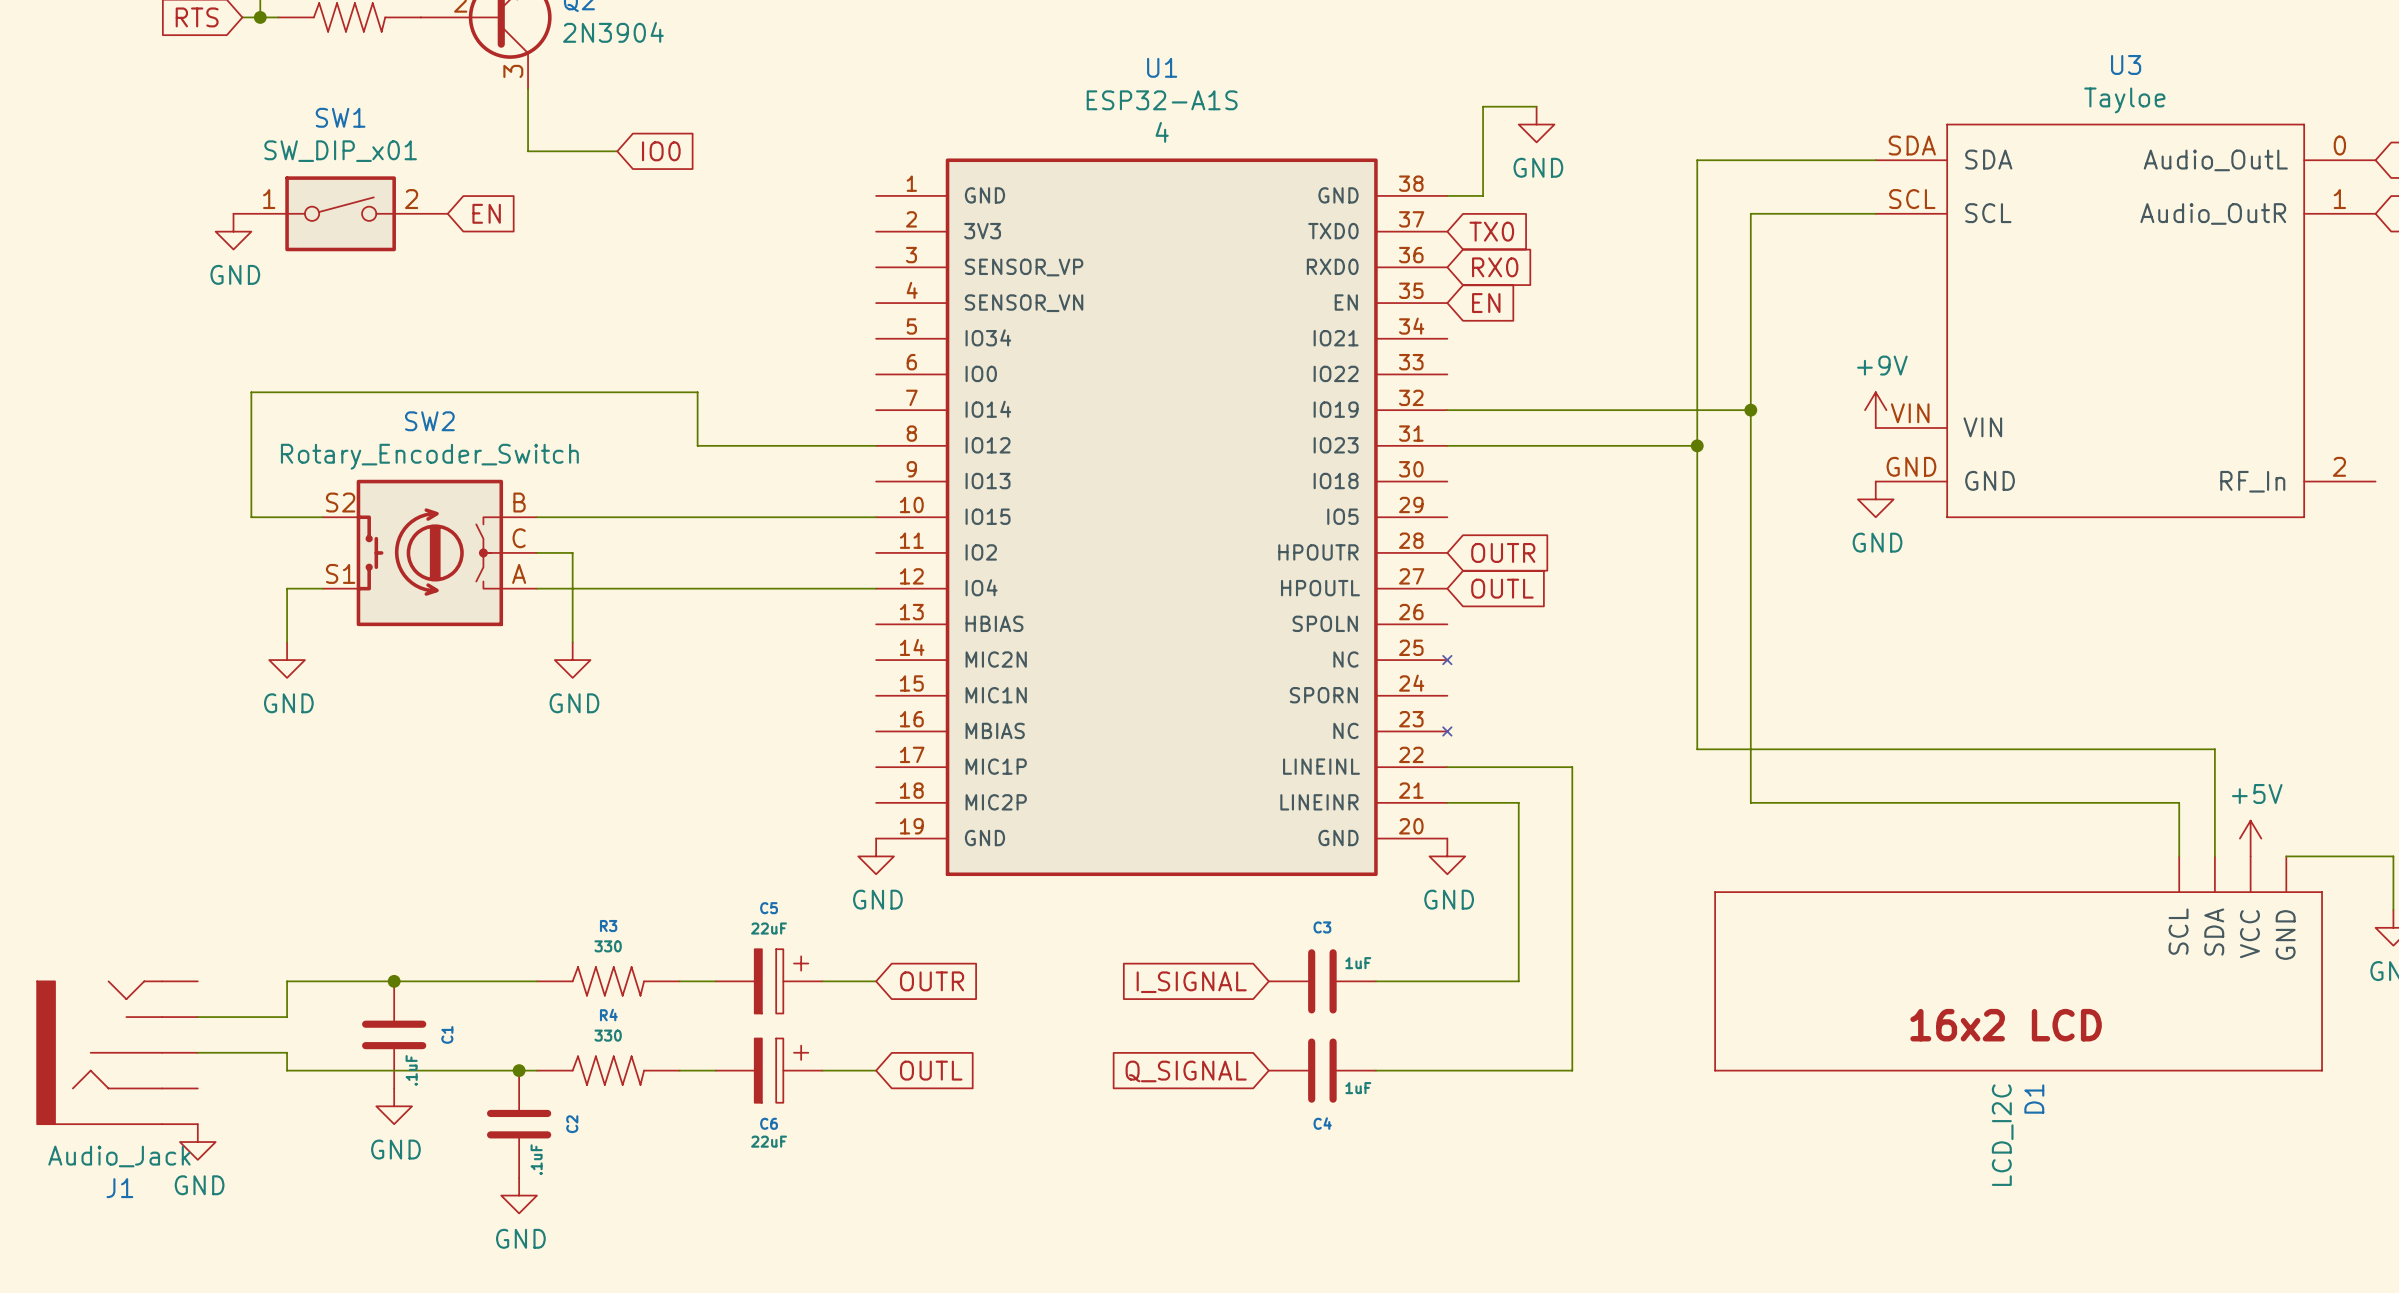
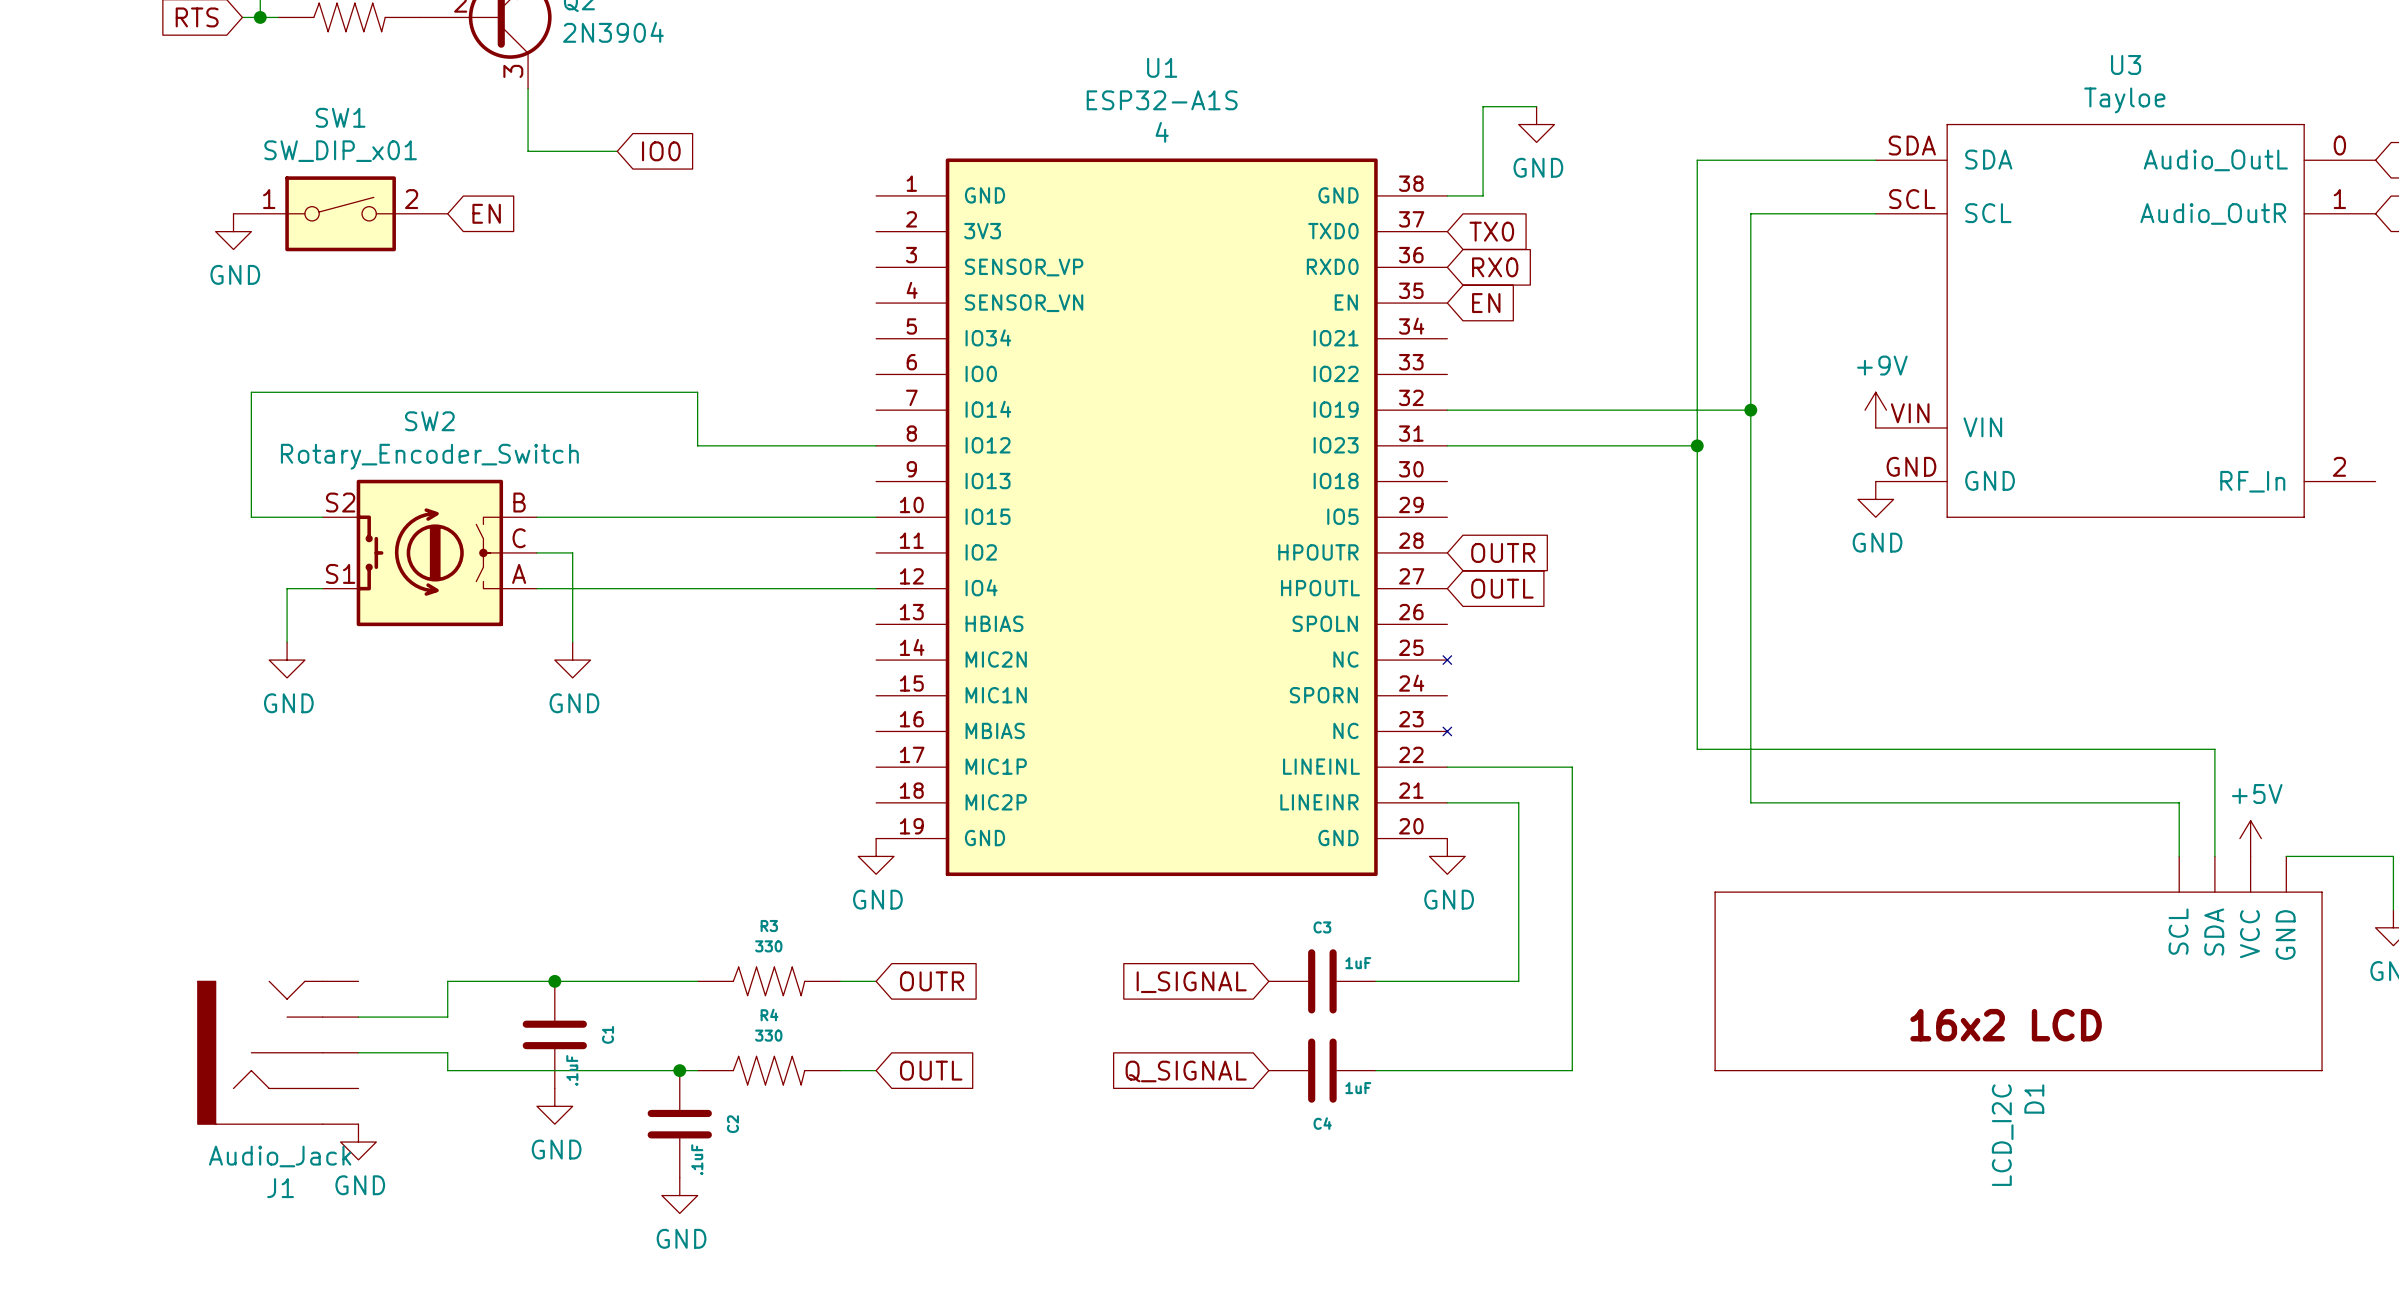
junction: (394, 981) -> none
wire: (447, 981) (287, 981) (287, 1017) (197, 1017) -> (447, 981) (447, 1017) (358, 1017)
junction: none -> (554, 981)
R3 position: (608, 981) -> (769, 981)
C5: 22uF (769, 981) -> none
C1 position: (394, 1034) -> (554, 1034)
J1 position: (117, 1052) -> (278, 1052)
wire: (197, 1052) (287, 1052) (287, 1070) (447, 1070) -> (358, 1052) (447, 1052) (447, 1070)
junction: (519, 1070) -> none
R4 position: (608, 1070) -> (769, 1070)
junction: none -> (679, 1070)
C6: 22uF (769, 1070) -> none
power symbol position: GND (394, 1106) -> GND (358, 1142)
power symbol: none -> GND (554, 1106)
C2 position: (519, 1124) -> (679, 1124)
power symbol: GND (197, 1142) -> none
power symbol: GND (519, 1195) -> none
power symbol: none -> GND (679, 1195)

